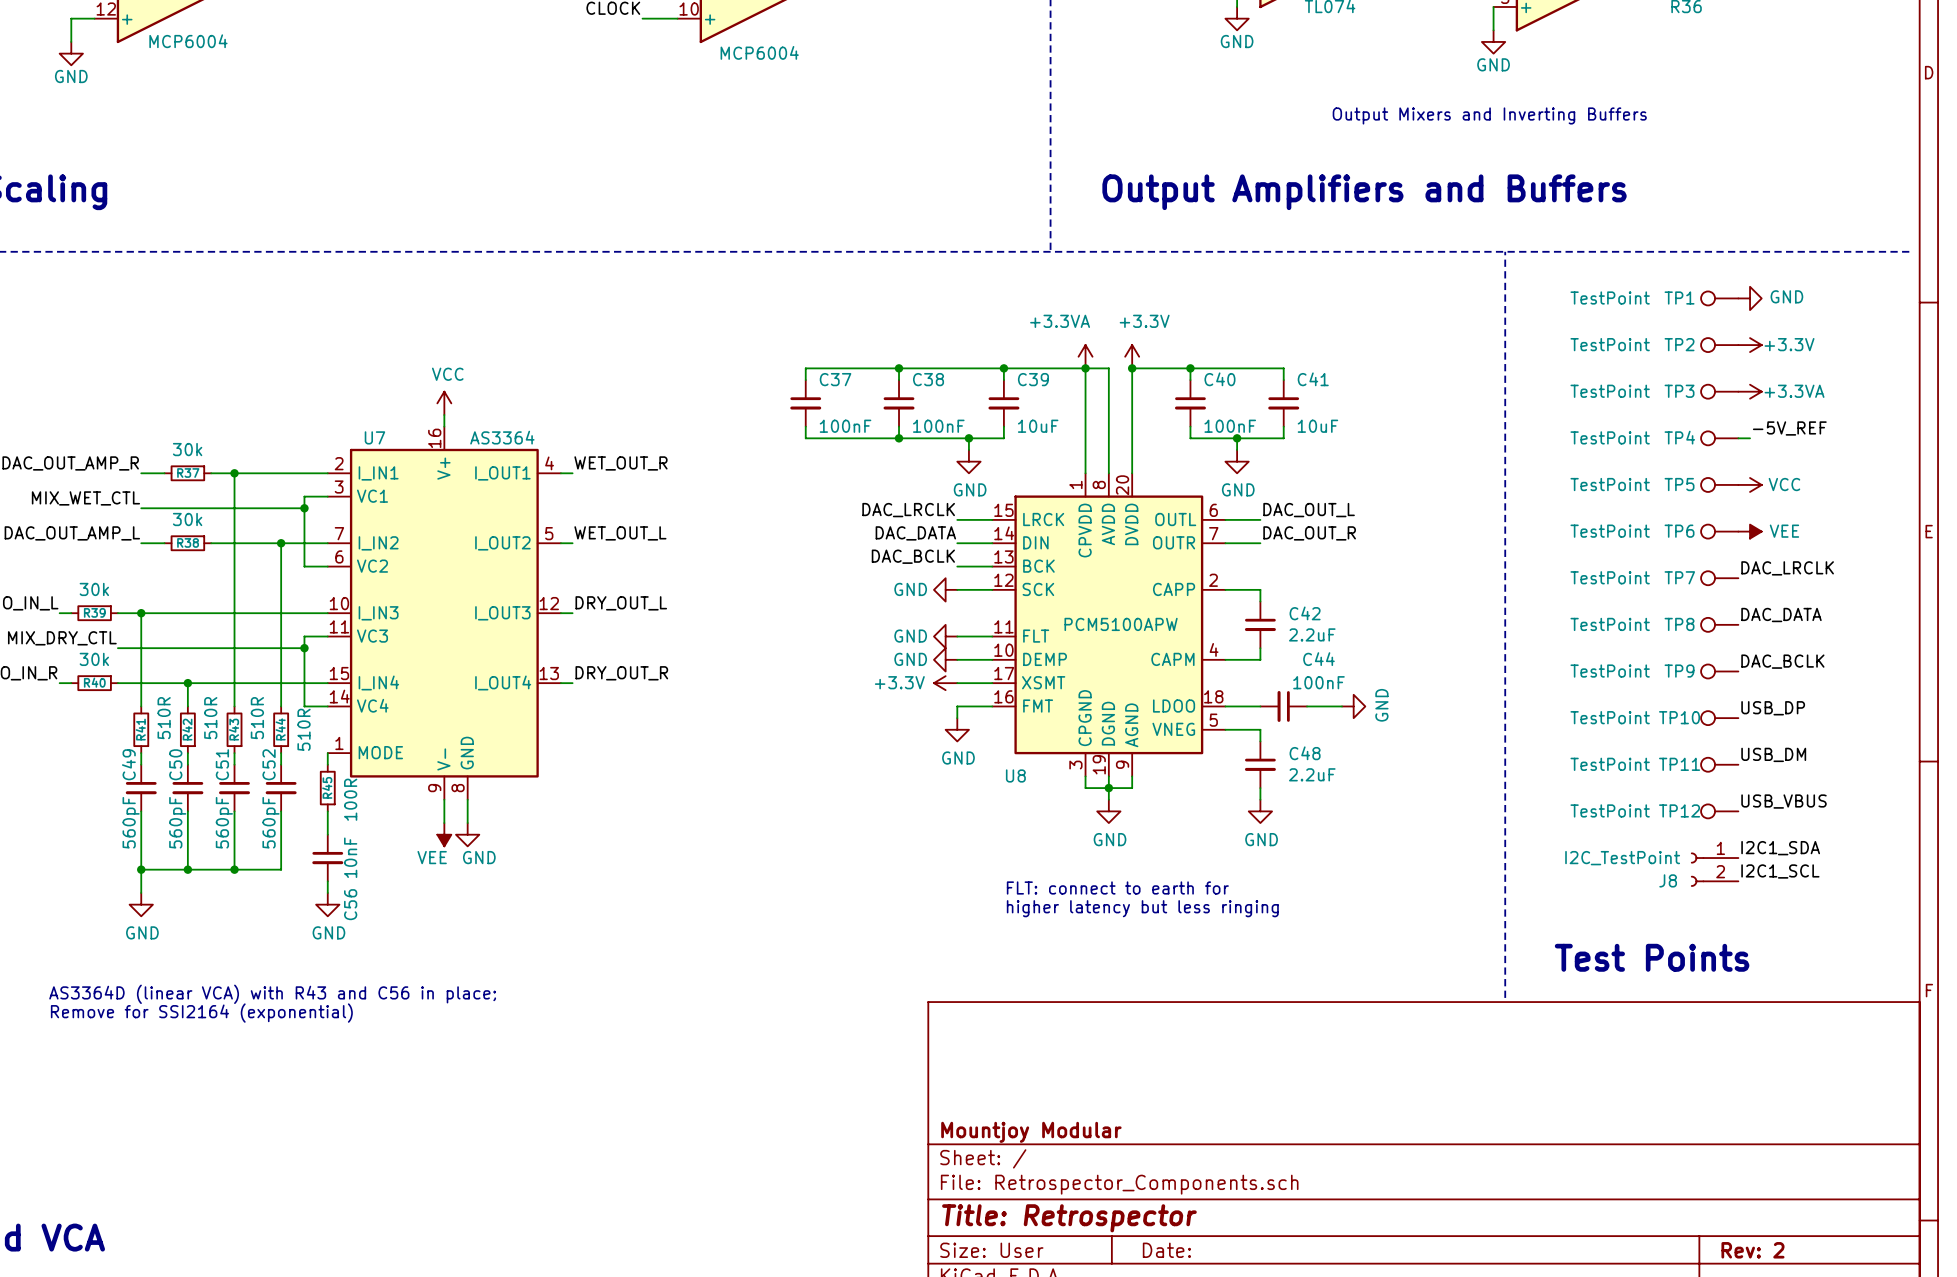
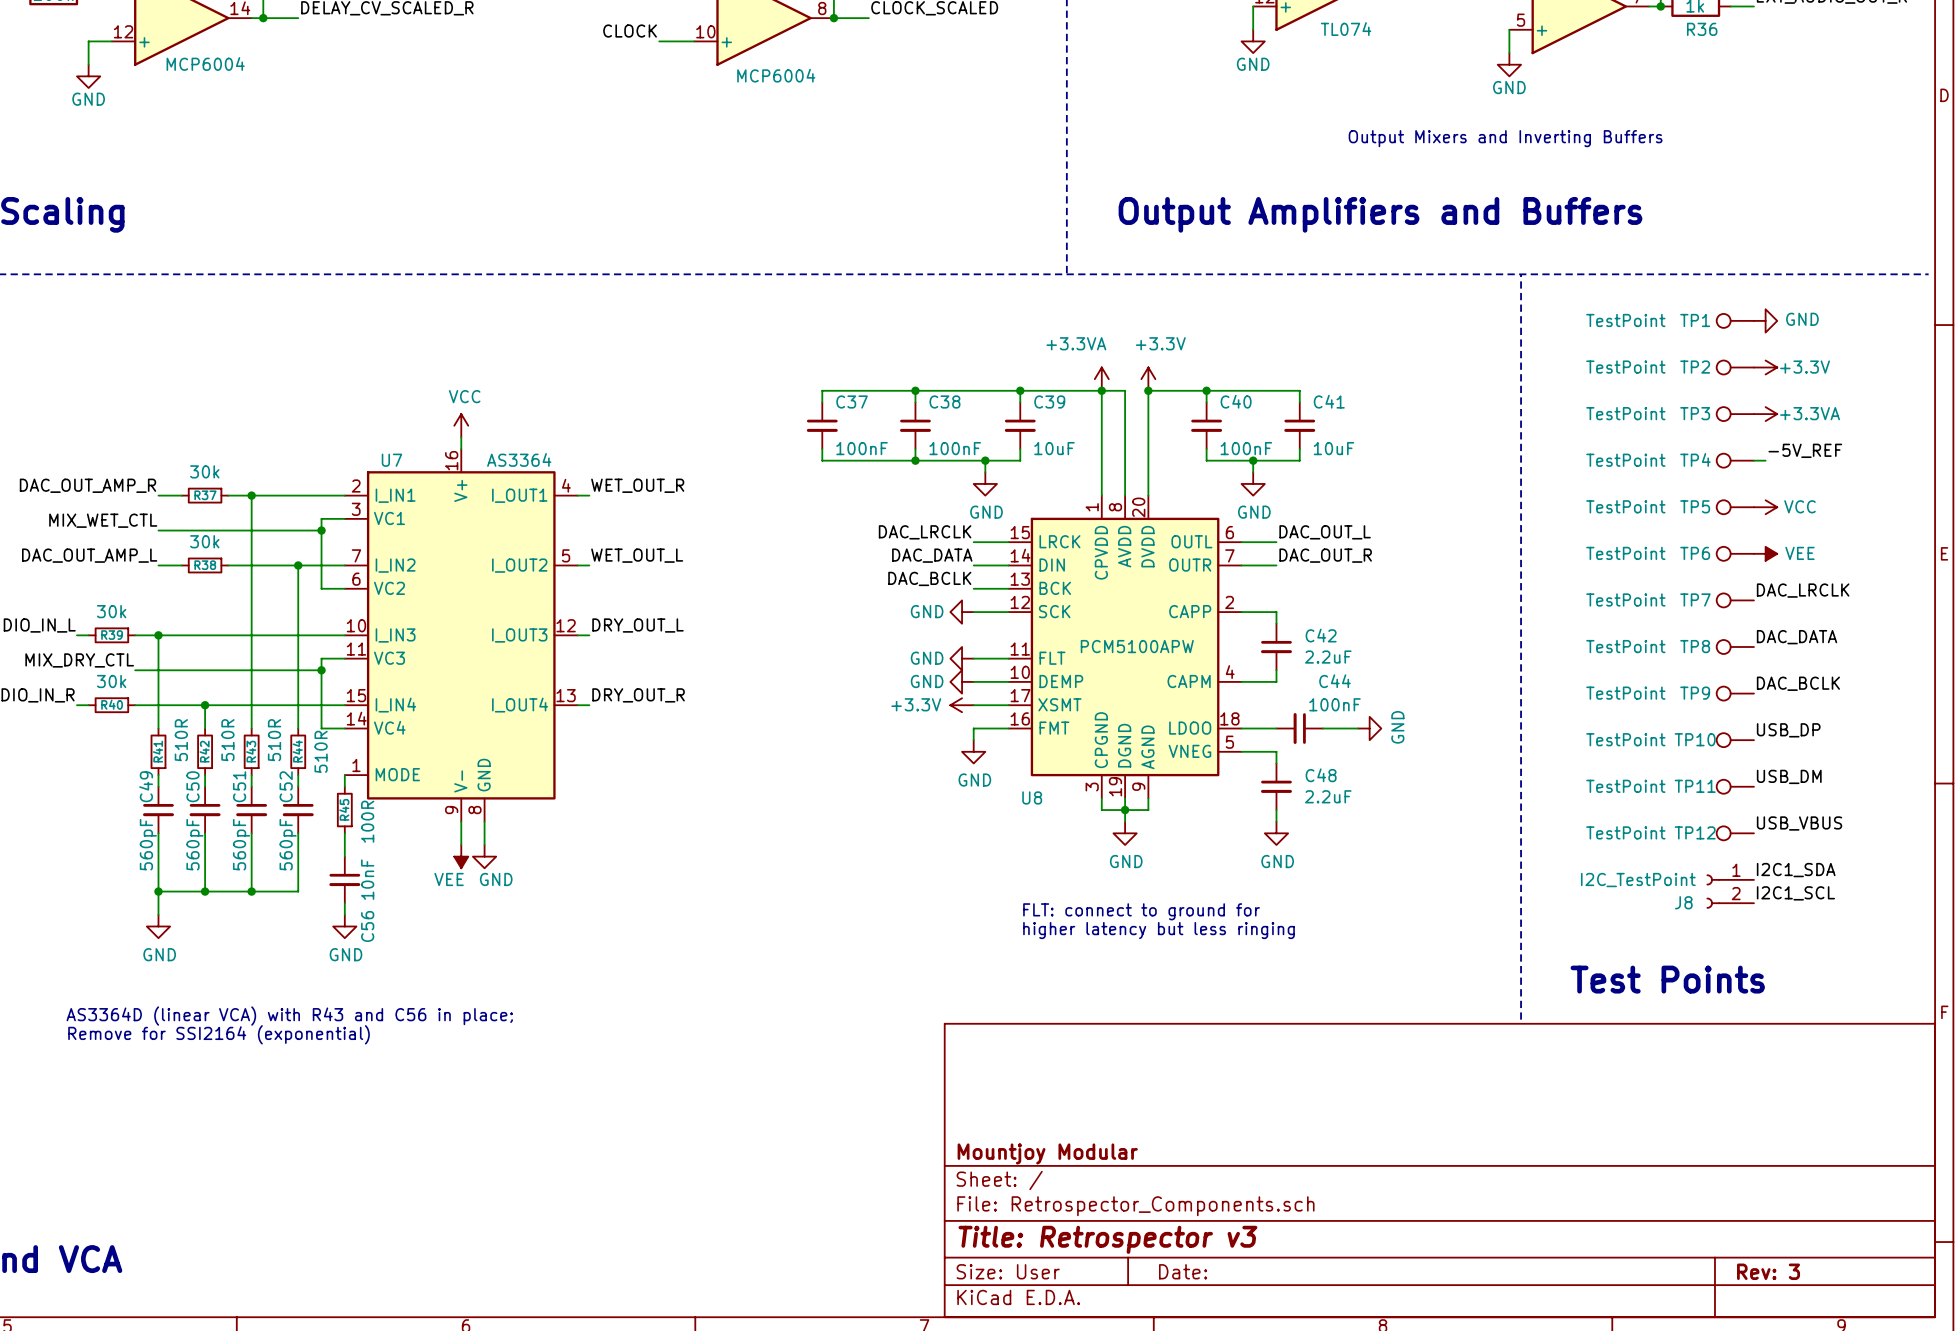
text: FLT: connect to earth for (1117, 887) -> FLT: connect to ground for (1141, 911)
title block: Title: Retrospector (1069, 1218) -> Title: Retrospector v3 (1107, 1239)
title block: Rev: 2 (1752, 1250) -> Rev: 3 (1768, 1271)

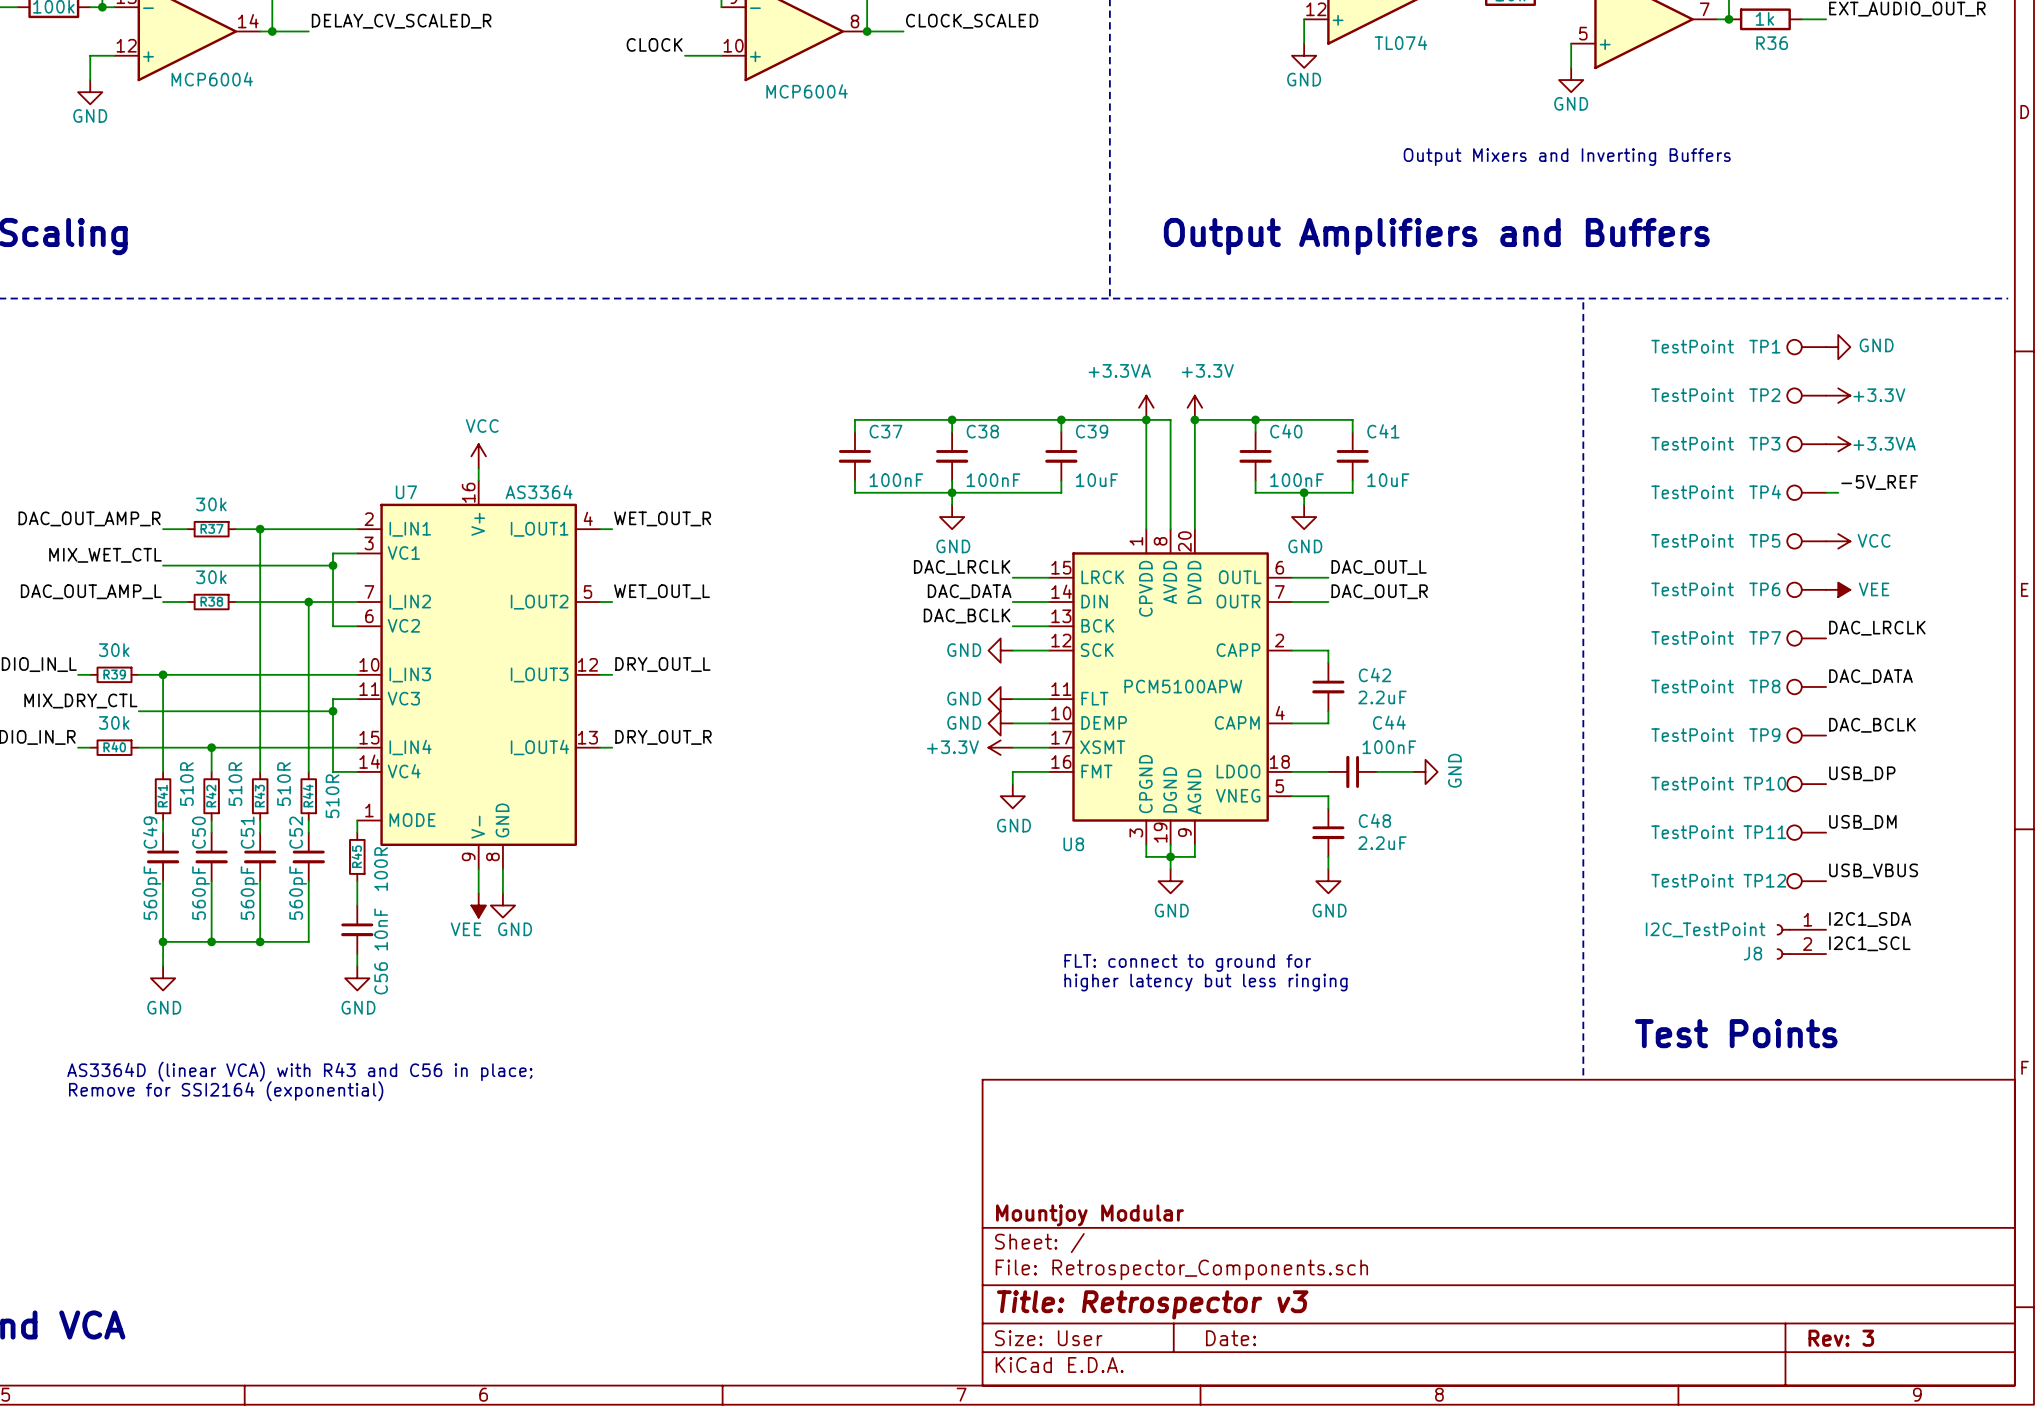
wire: (985, 460) (985, 472) -> (952, 492) (952, 504)
junction: (985, 460) -> none
power symbol position: GND (985, 483) -> GND (952, 517)

